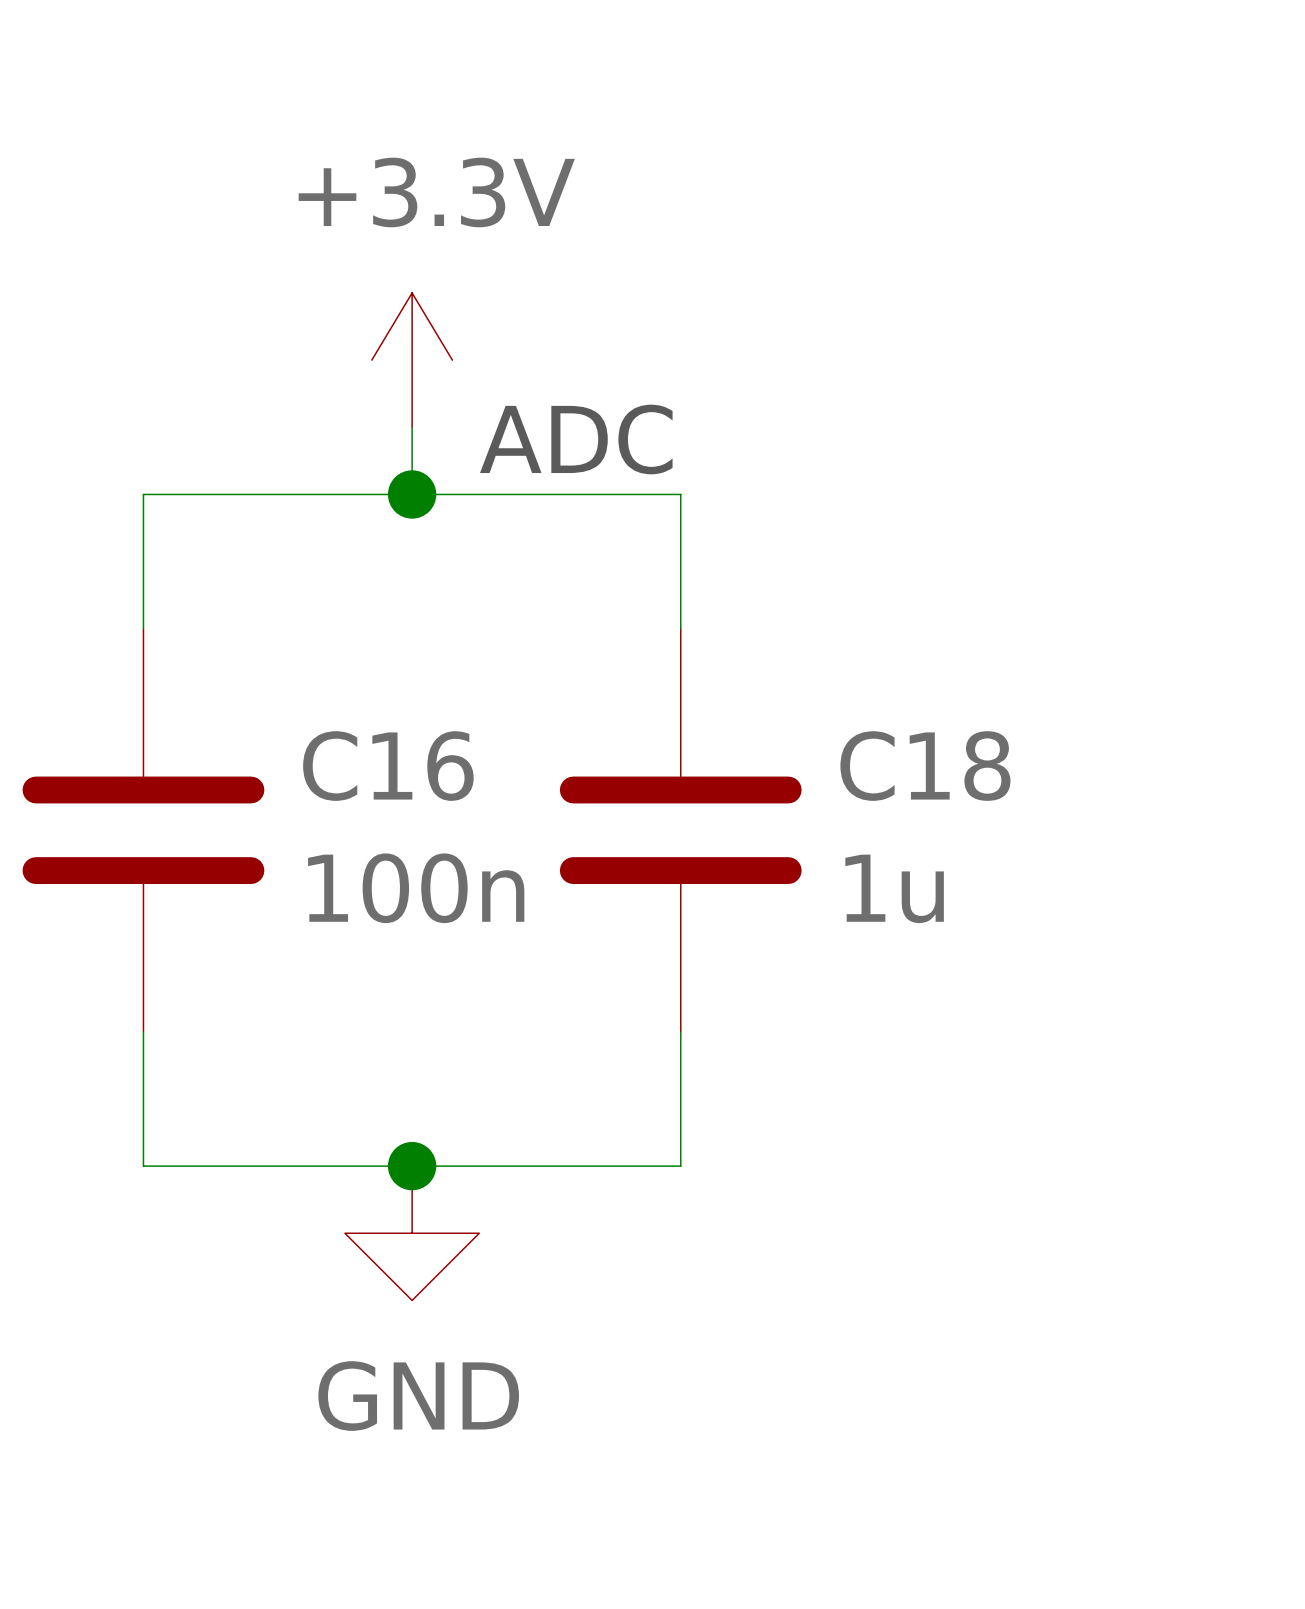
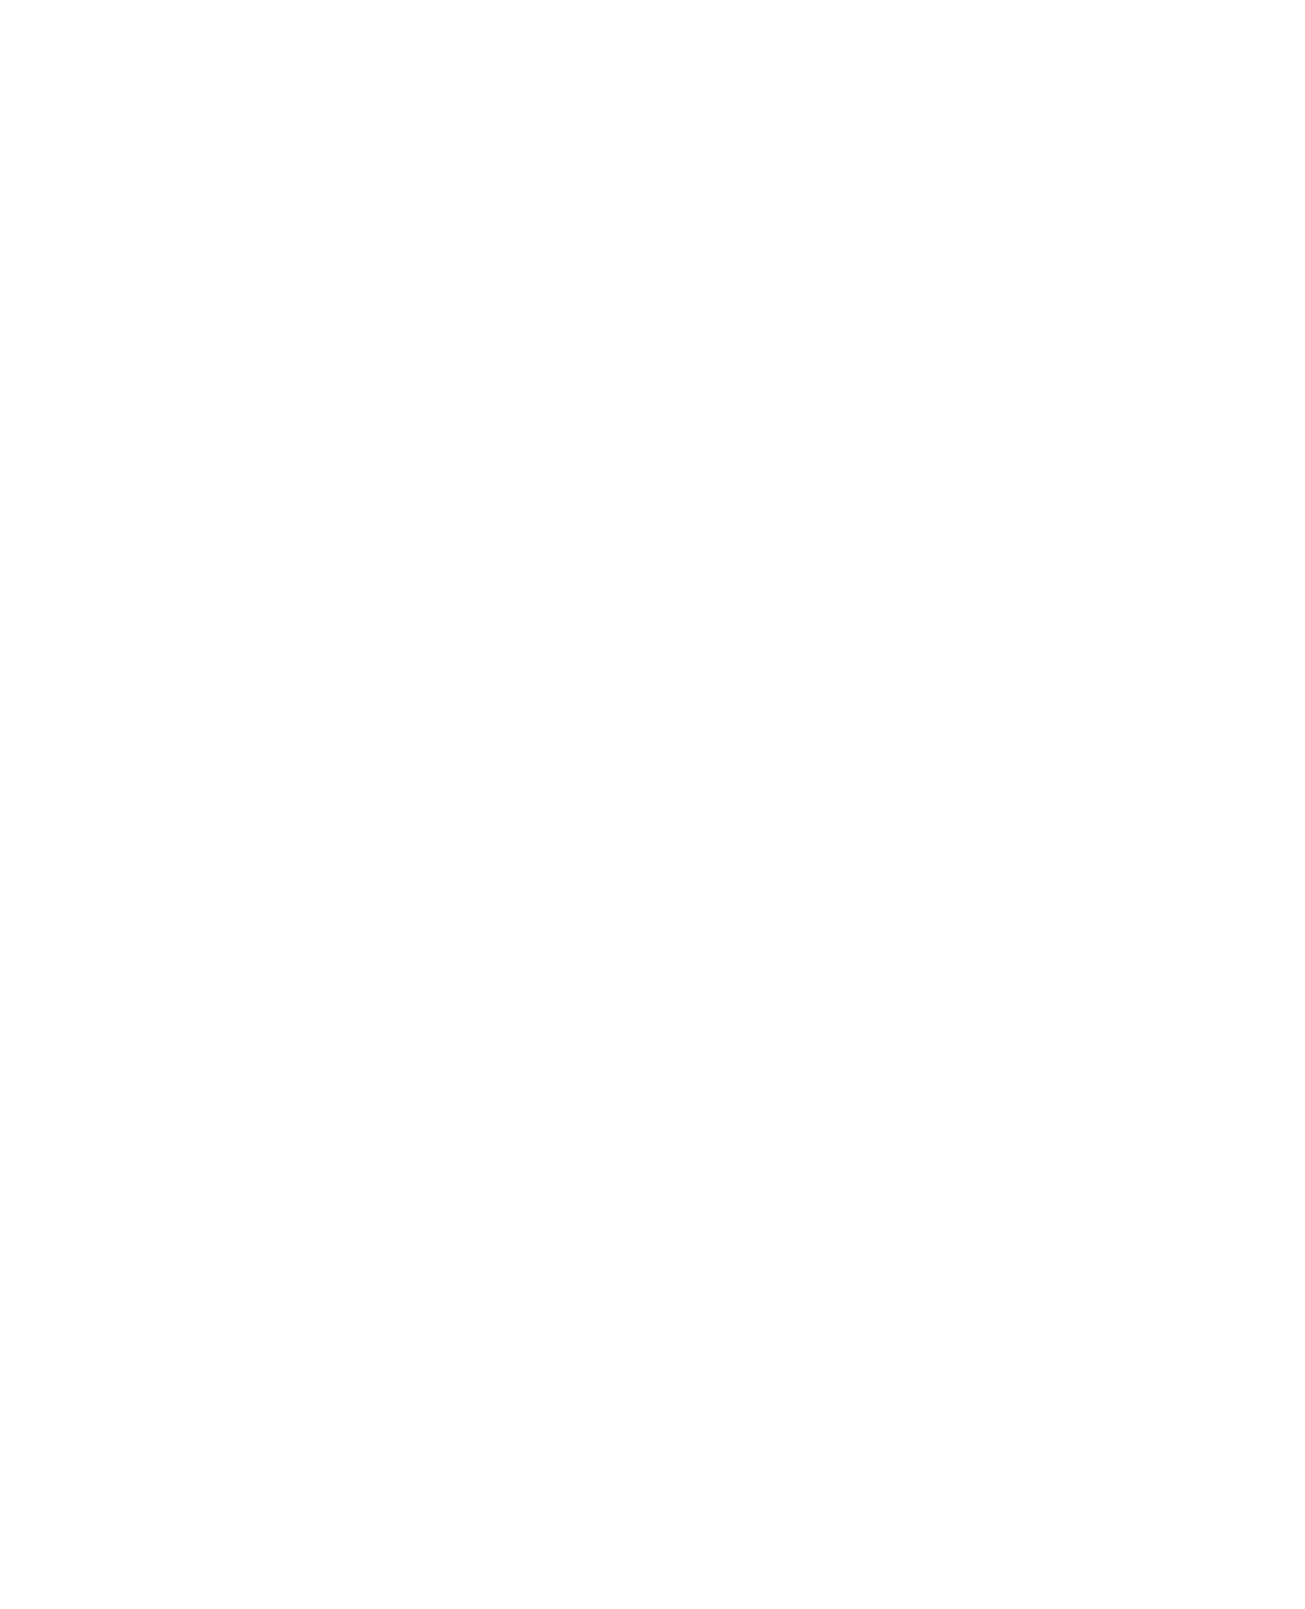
power symbol: +3.3V (412, 360) -> none
wire: (412, 427) (412, 494) -> none
text: ADC (576, 439) -> none
junction: (412, 494) -> none
wire: (143, 628) (143, 494) (680, 494) (680, 628) -> none
C16: 100n (143, 830) -> none
C18: 1u (680, 830) -> none
wire: (143, 1031) (143, 1166) (680, 1166) (680, 1031) -> none
junction: (412, 1166) -> none
power symbol: GND (412, 1233) -> none

